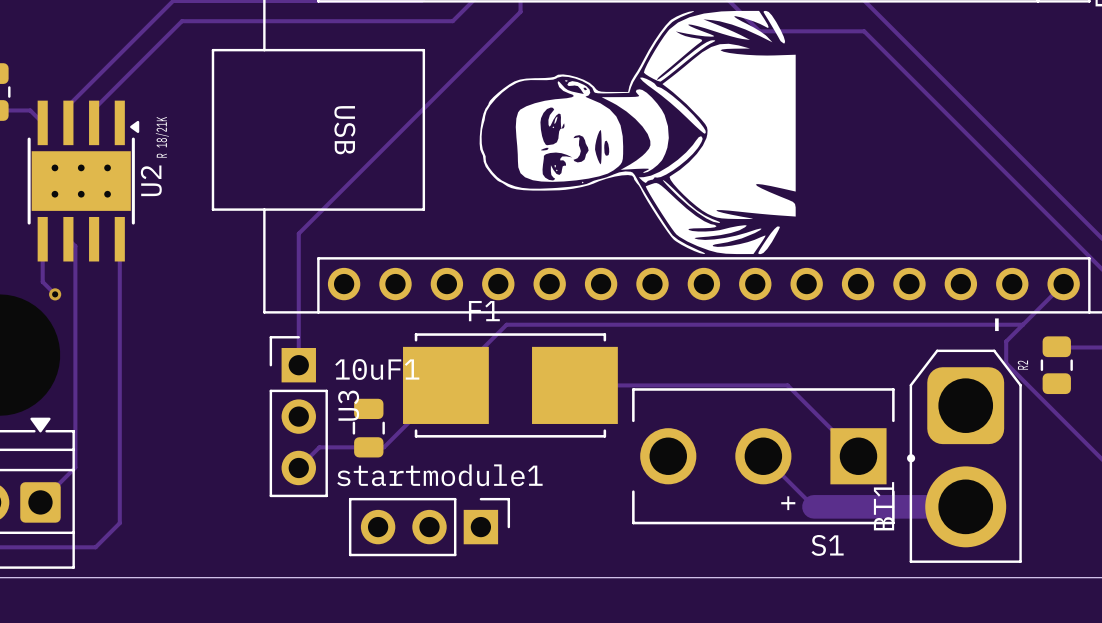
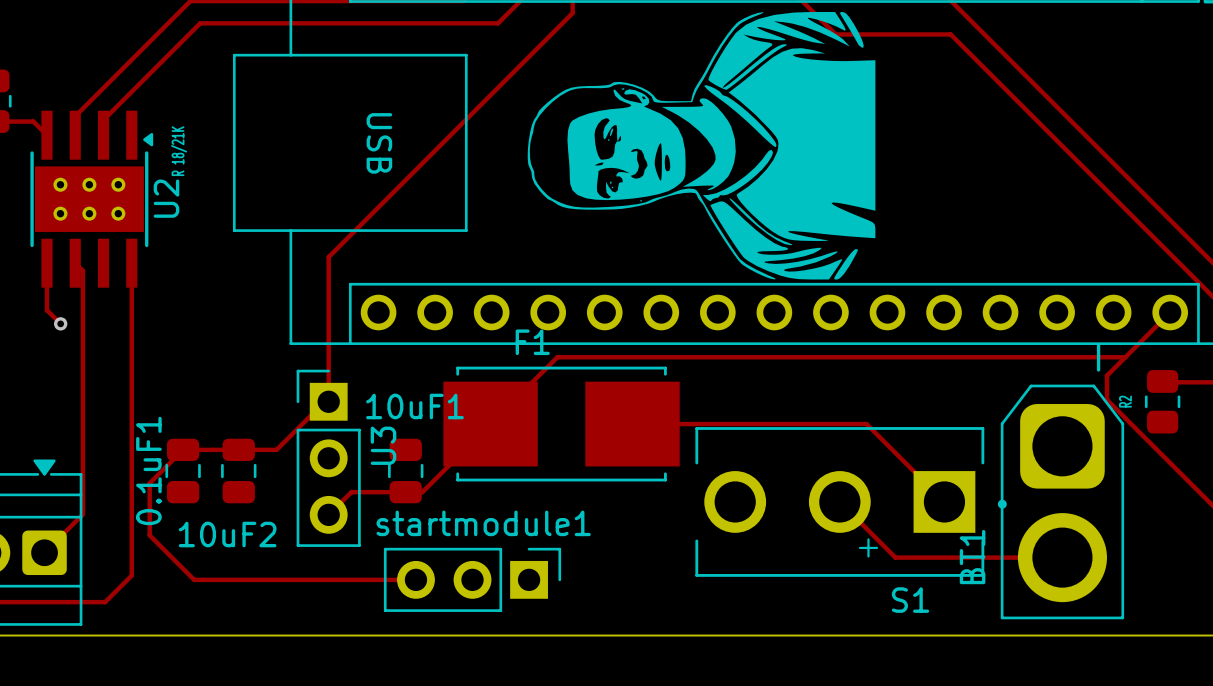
track: none -> (328, 401) (324, 401) (276, 449) (173, 449)
track: none -> (183, 449) (149, 483) (149, 535) (194, 579) (415, 579)
0.1uF1: none -> (183, 471)
10uF2: none -> (238, 471)
track width: thick (813, 506) (965, 506) -> thin (895, 557) (1062, 557)

